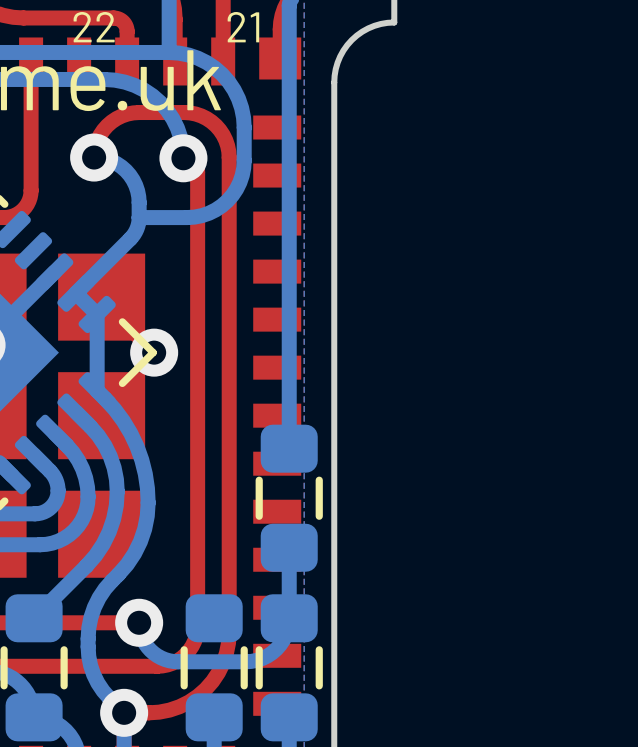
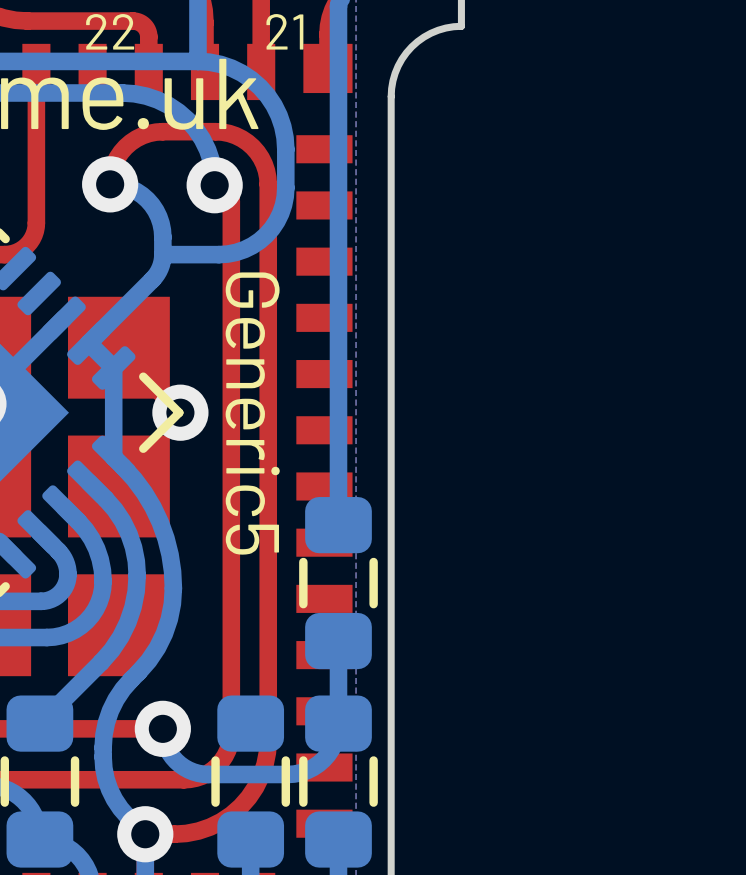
text: none -> Generic5 (252, 413)

